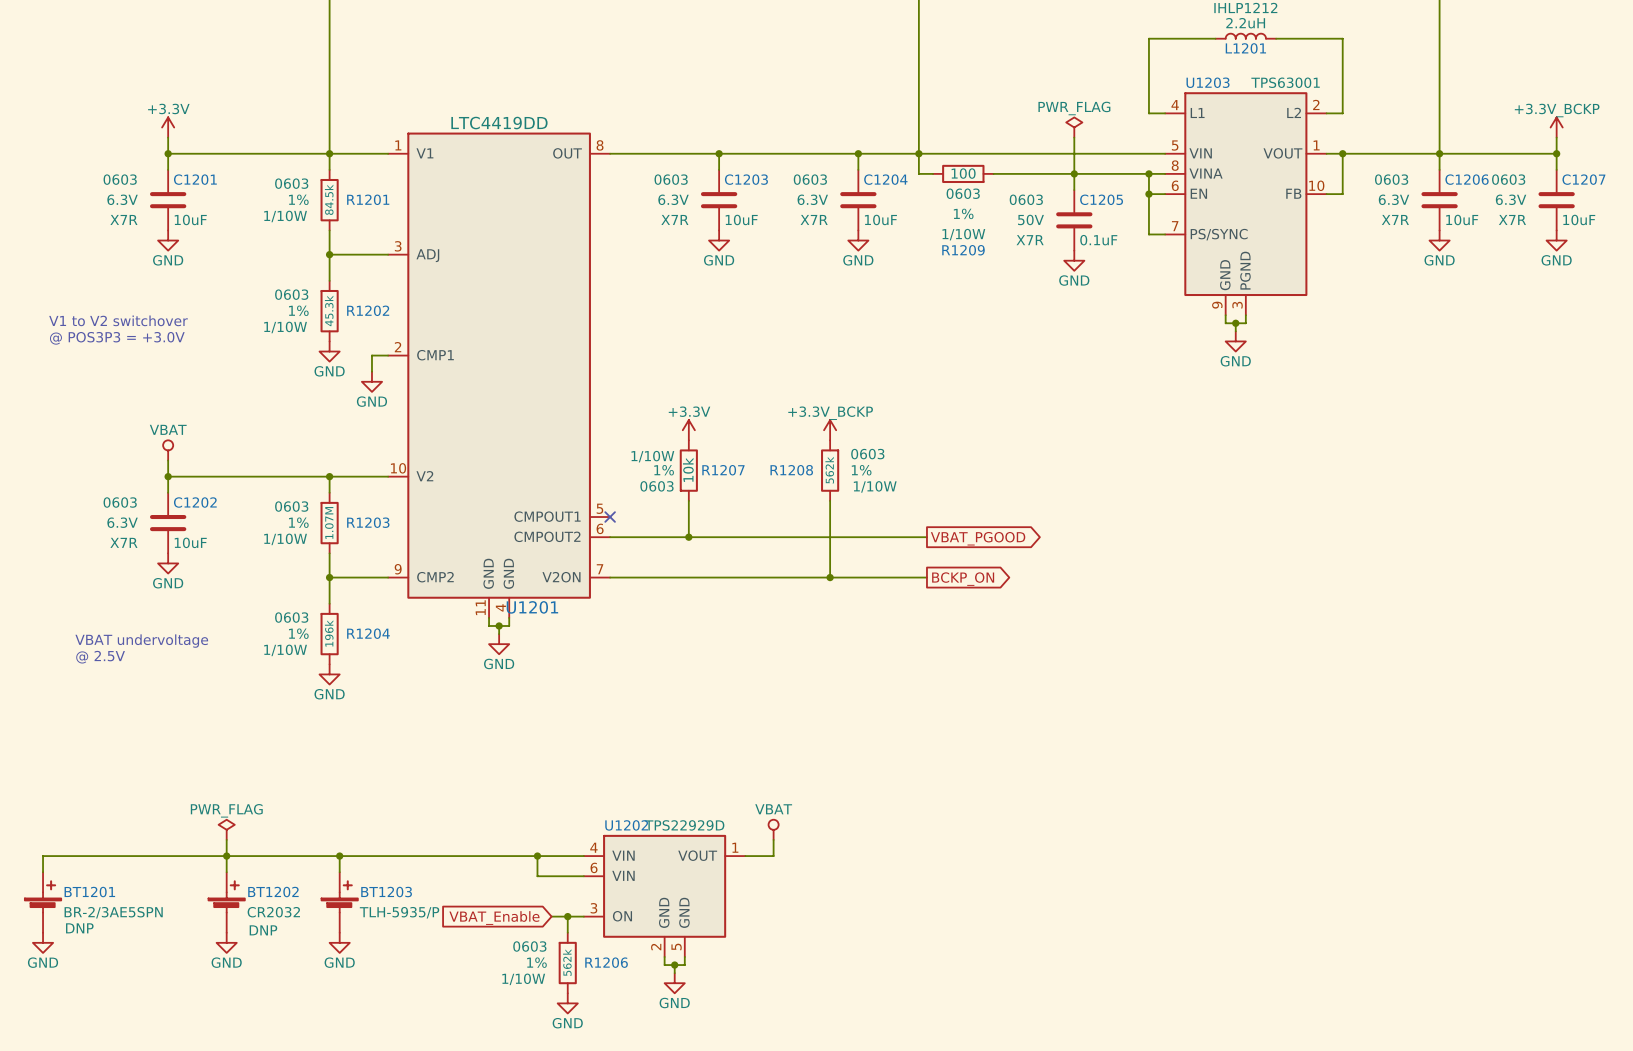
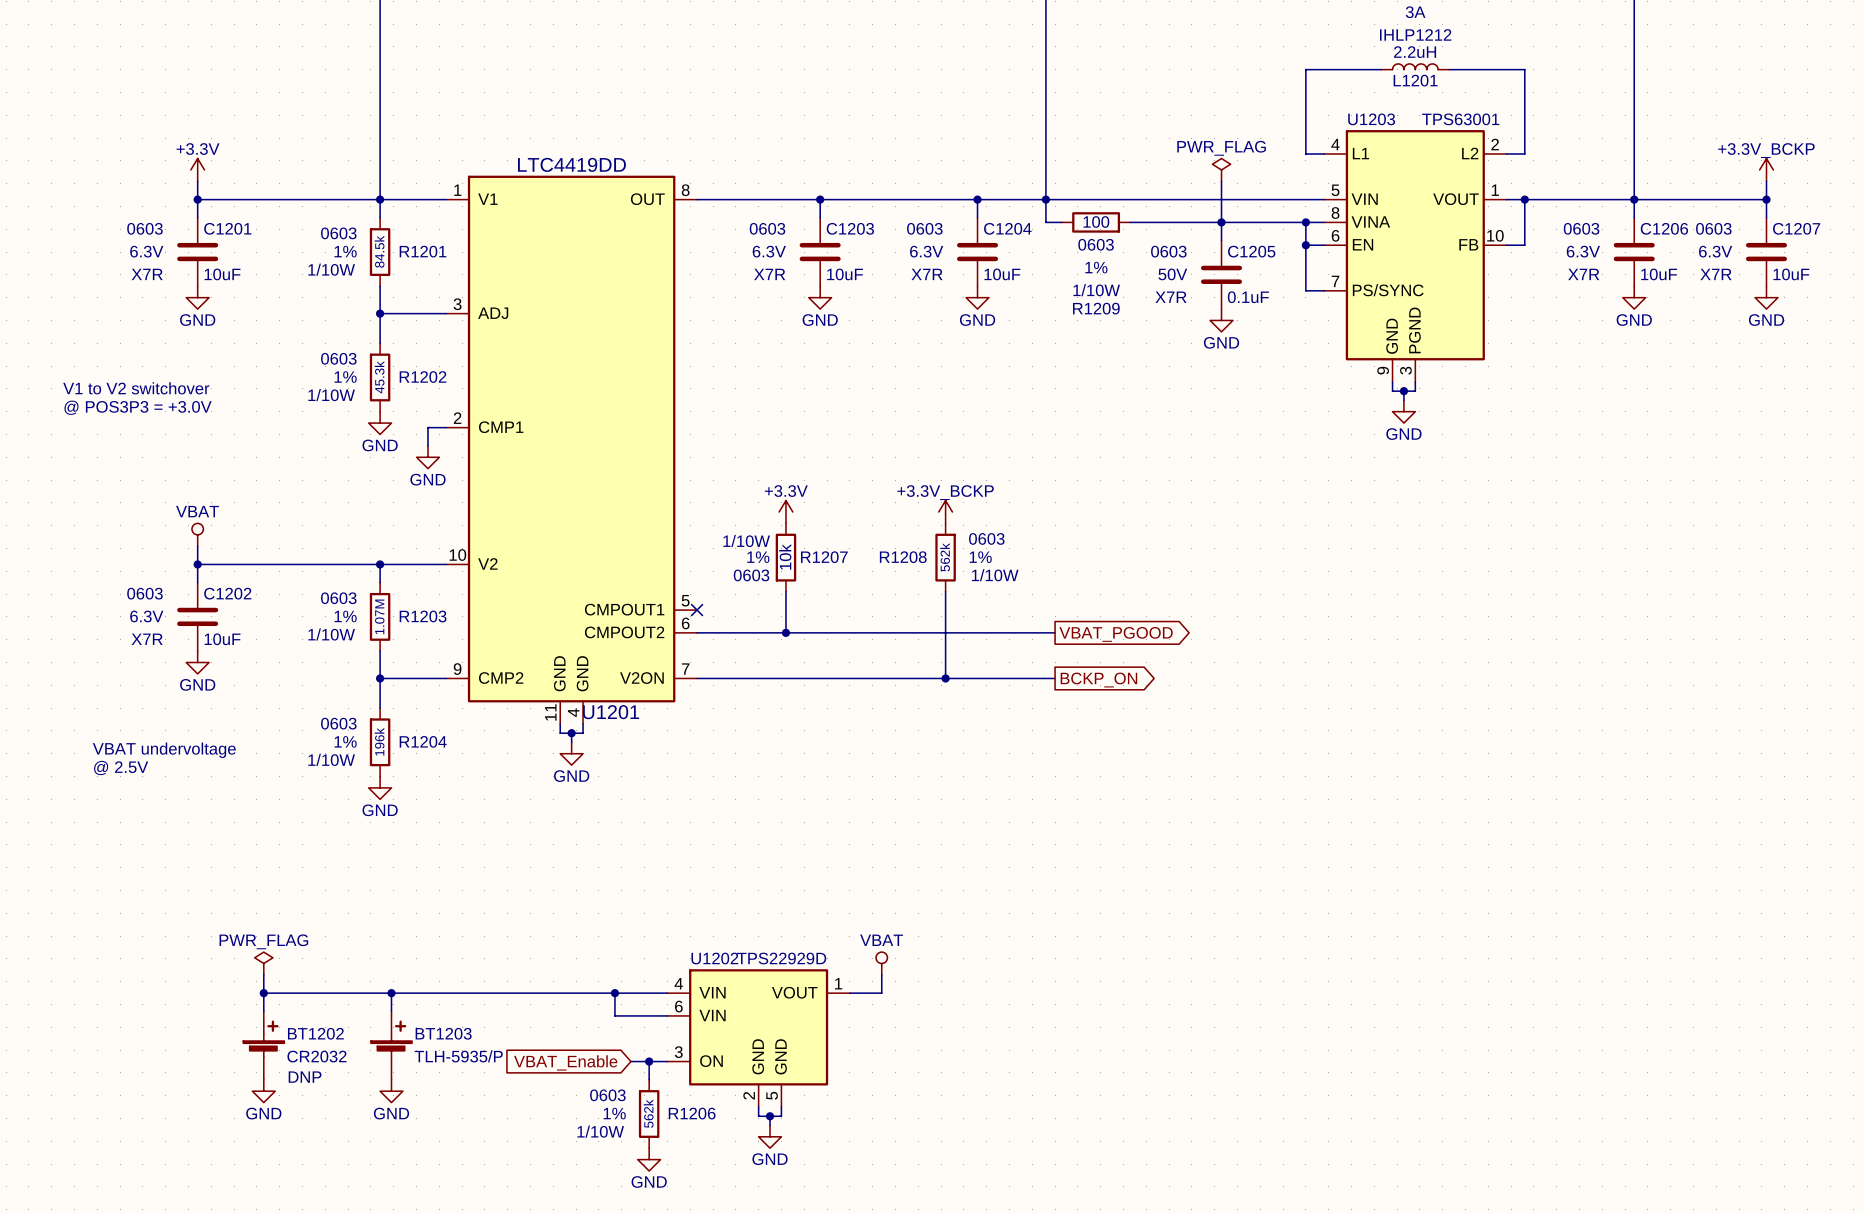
wire: (226, 856) (43, 856) (43, 872) -> none
BT1201: BR-2/3AE5SPN (43, 902) -> none
power symbol: GND (43, 942) -> none

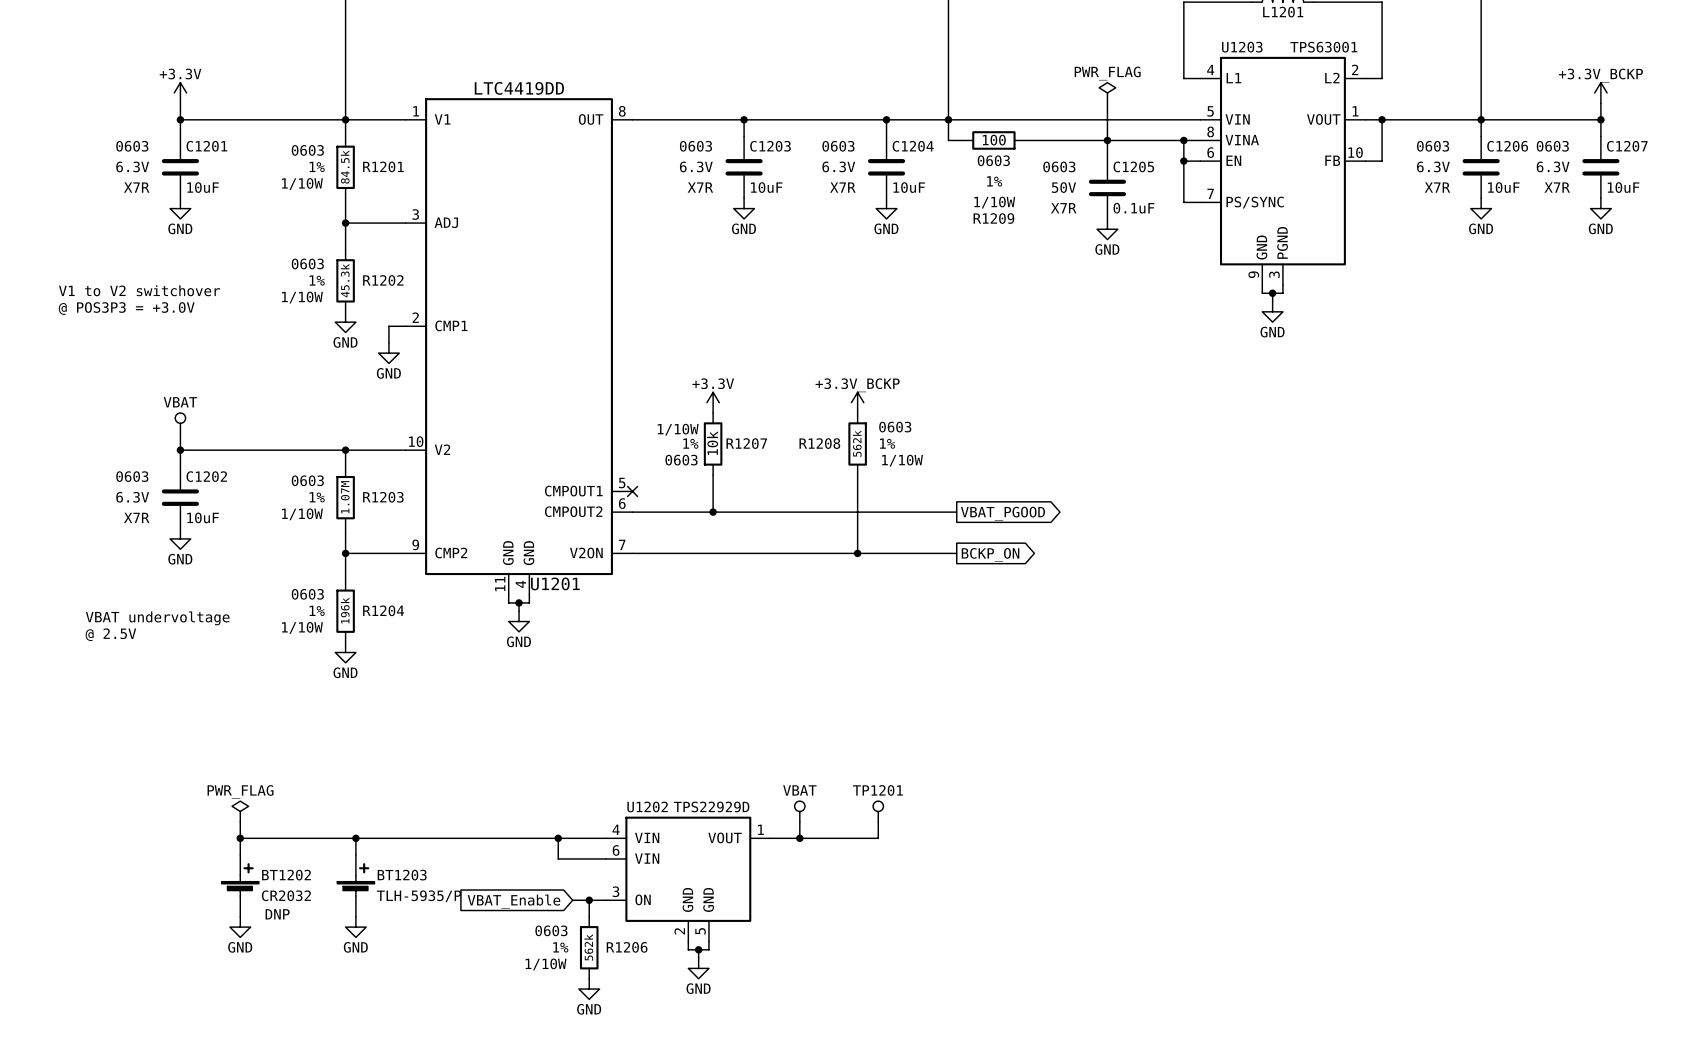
TP1201: none -> (878, 811)
wire: none -> (878, 821) (878, 838) (799, 838)
junction: none -> (799, 838)

